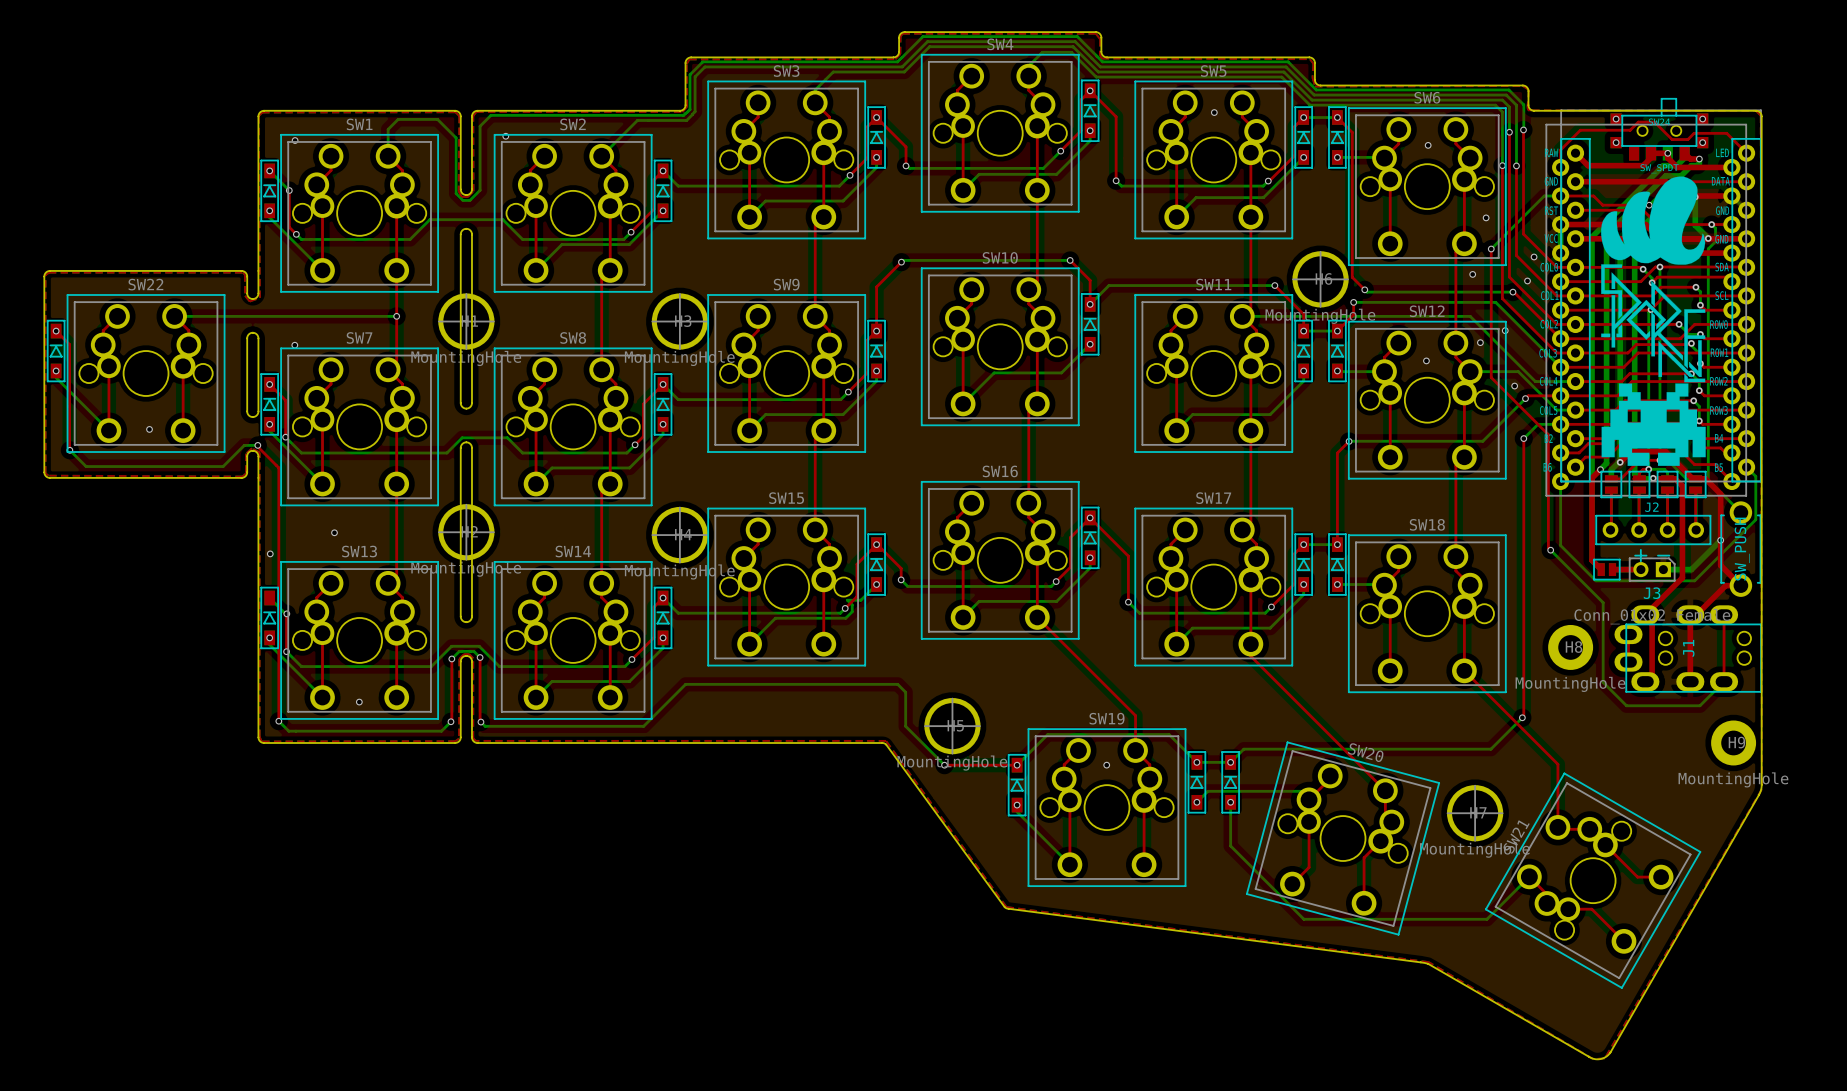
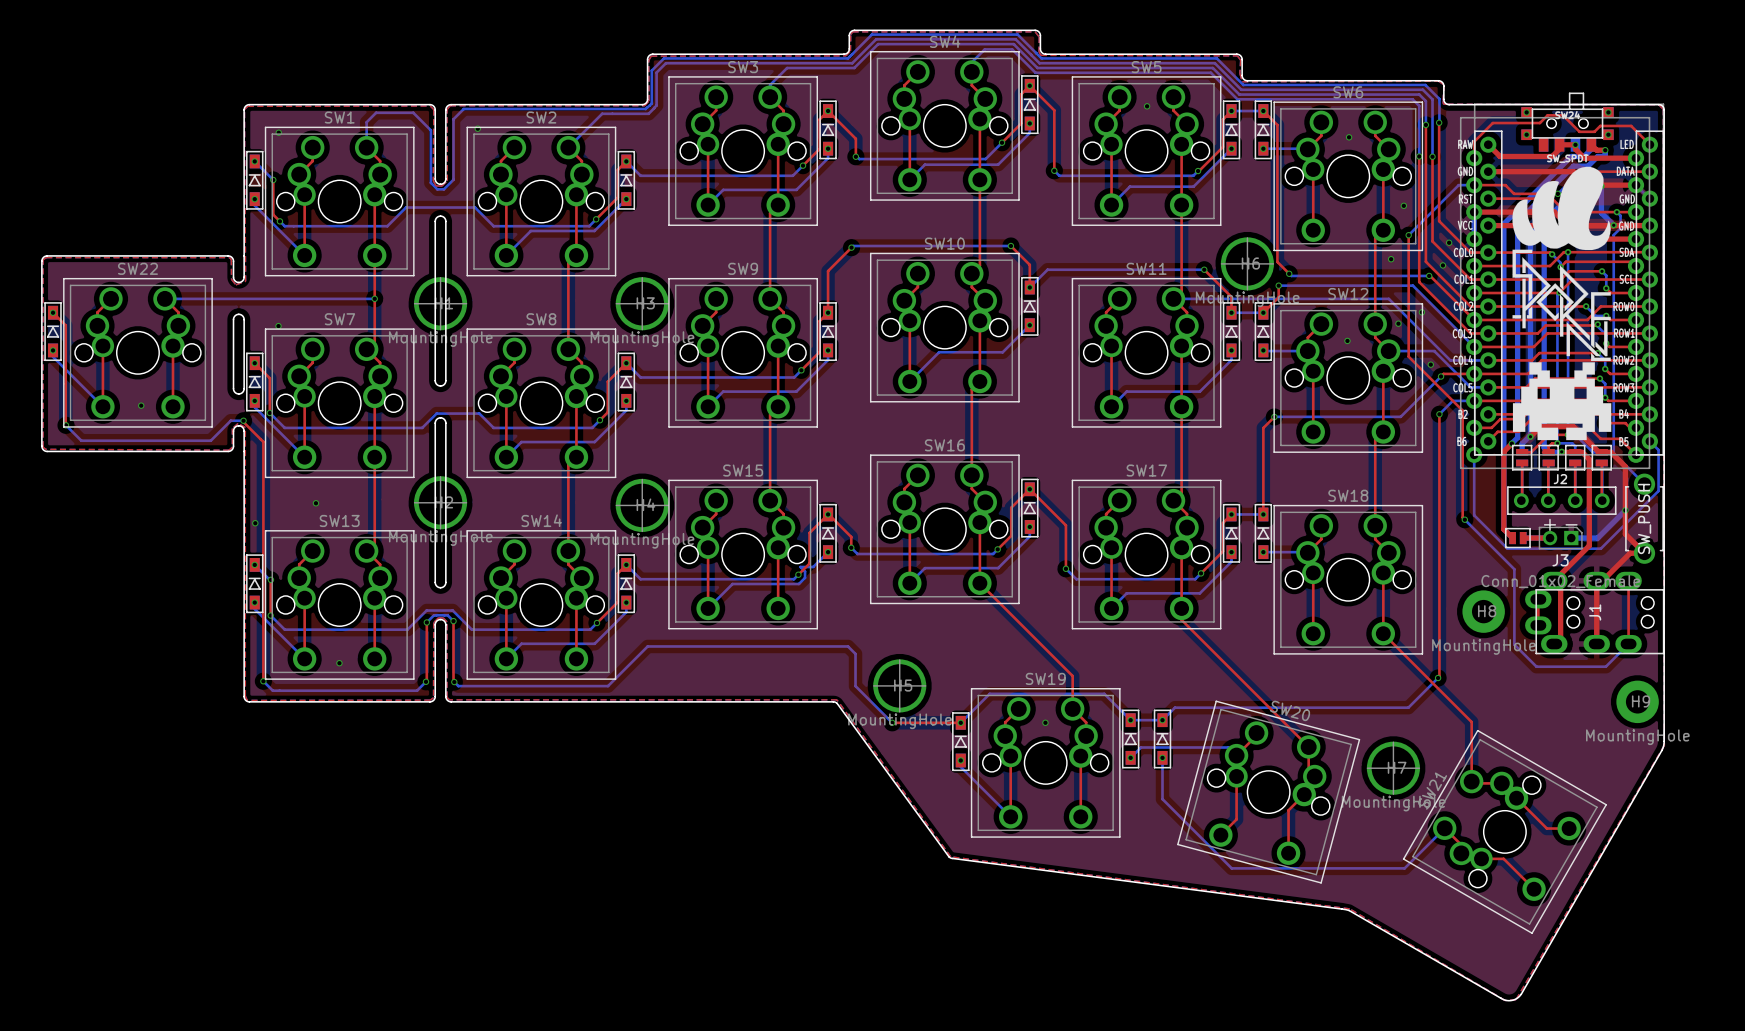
via: none -> (254, 564)

